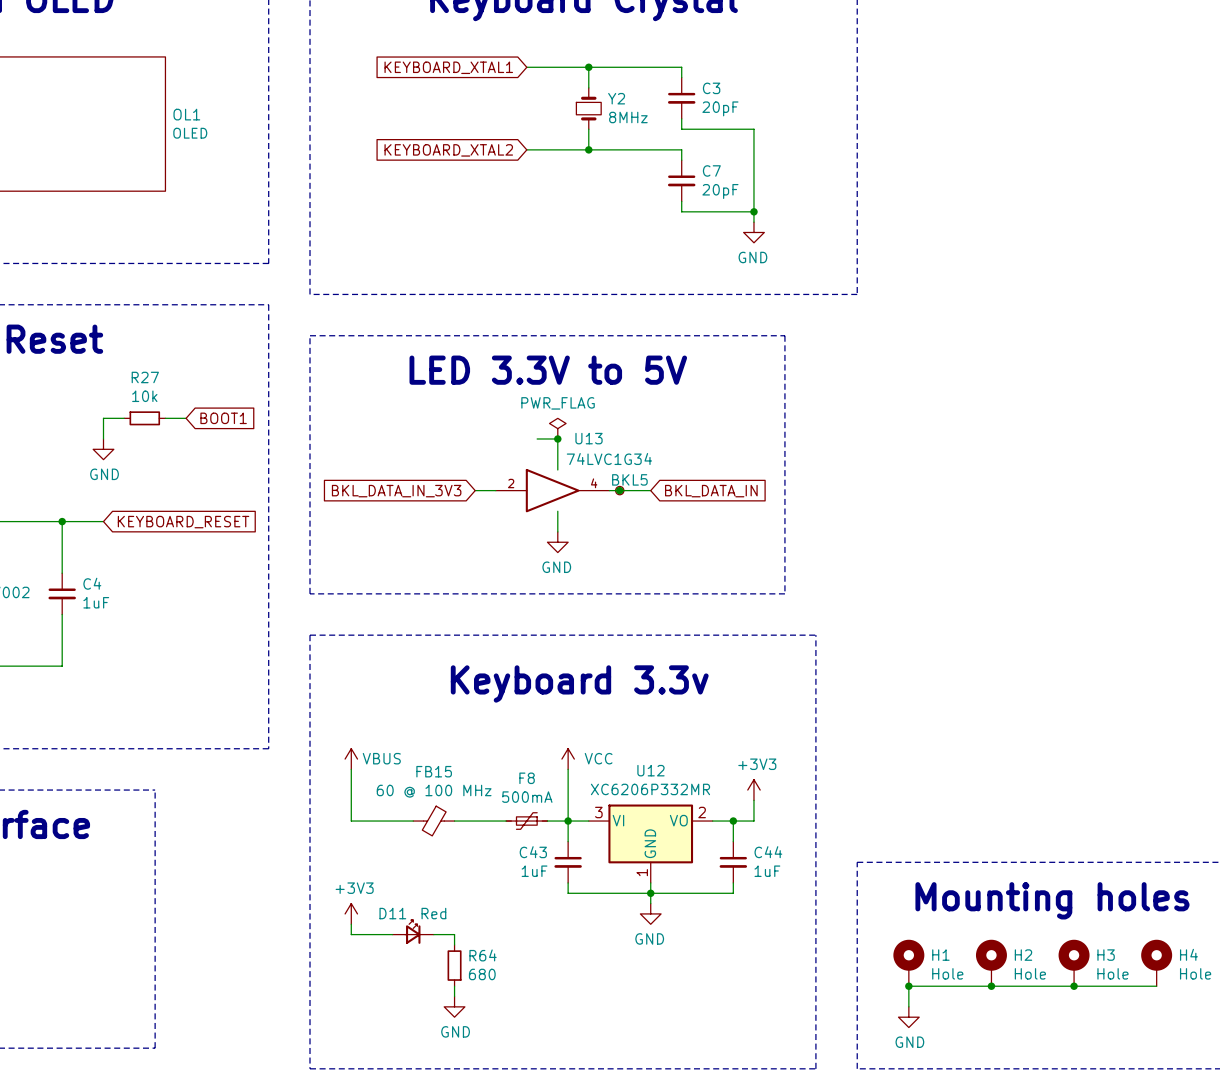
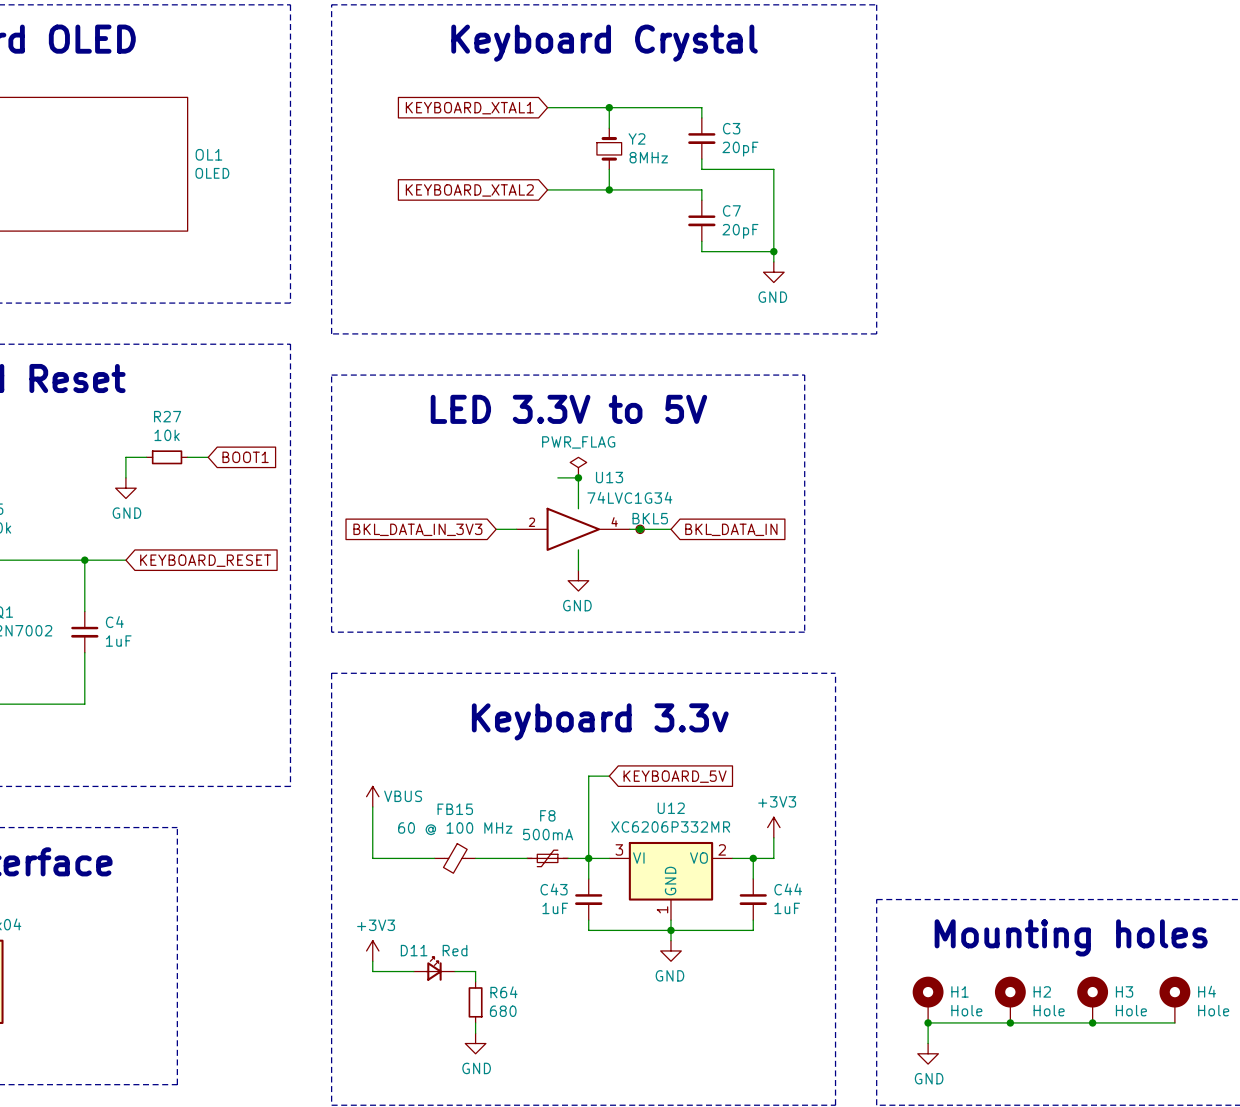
wire: none -> (609, 776) (588, 776) (588, 806)
global label: none -> KEYBOARD_5V (675, 776)
power symbol: VCC (568, 759) -> none

